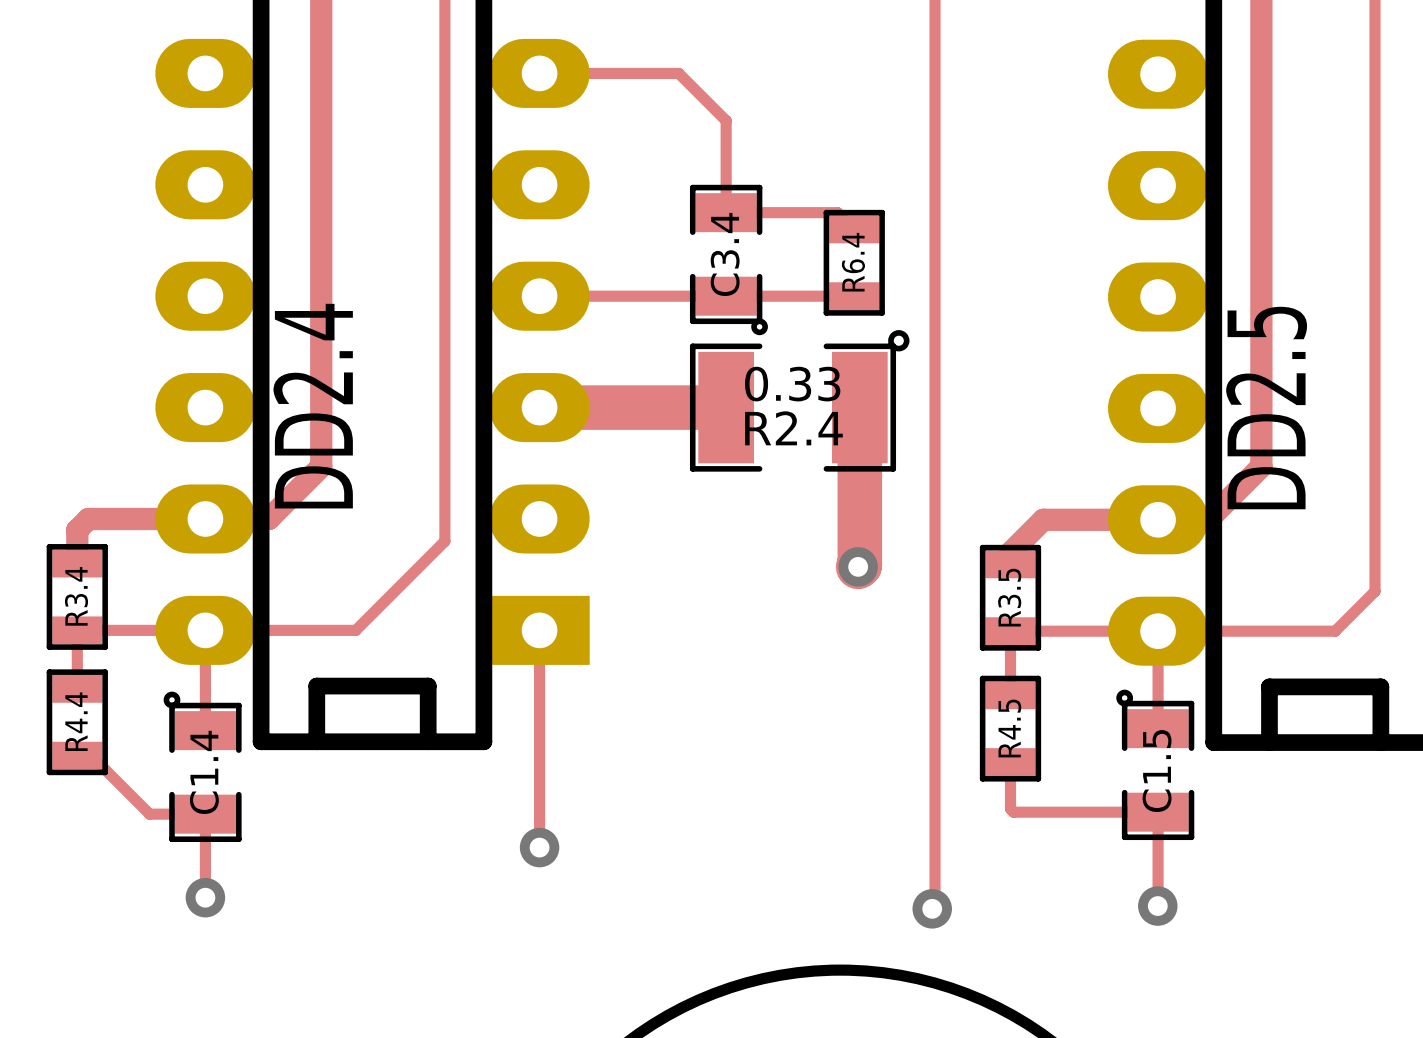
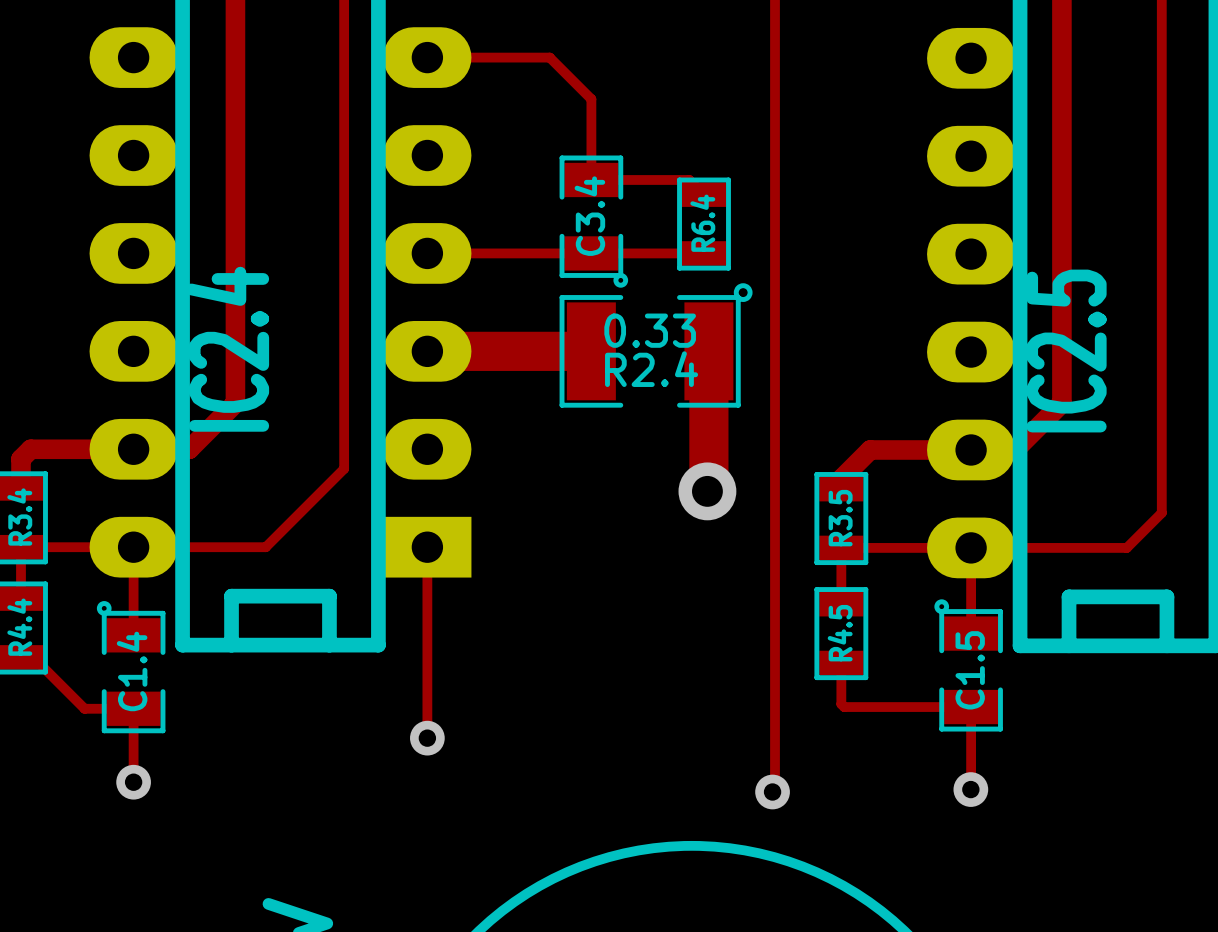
DD2.4 name: DD2.4 (313, 406) -> IC2.4 (227, 349)
DD2.5 name: DD2.5 (1266, 408) -> IC2.5 (1066, 351)
via size: [838, 547, 878, 587] -> [678, 462, 737, 521]

